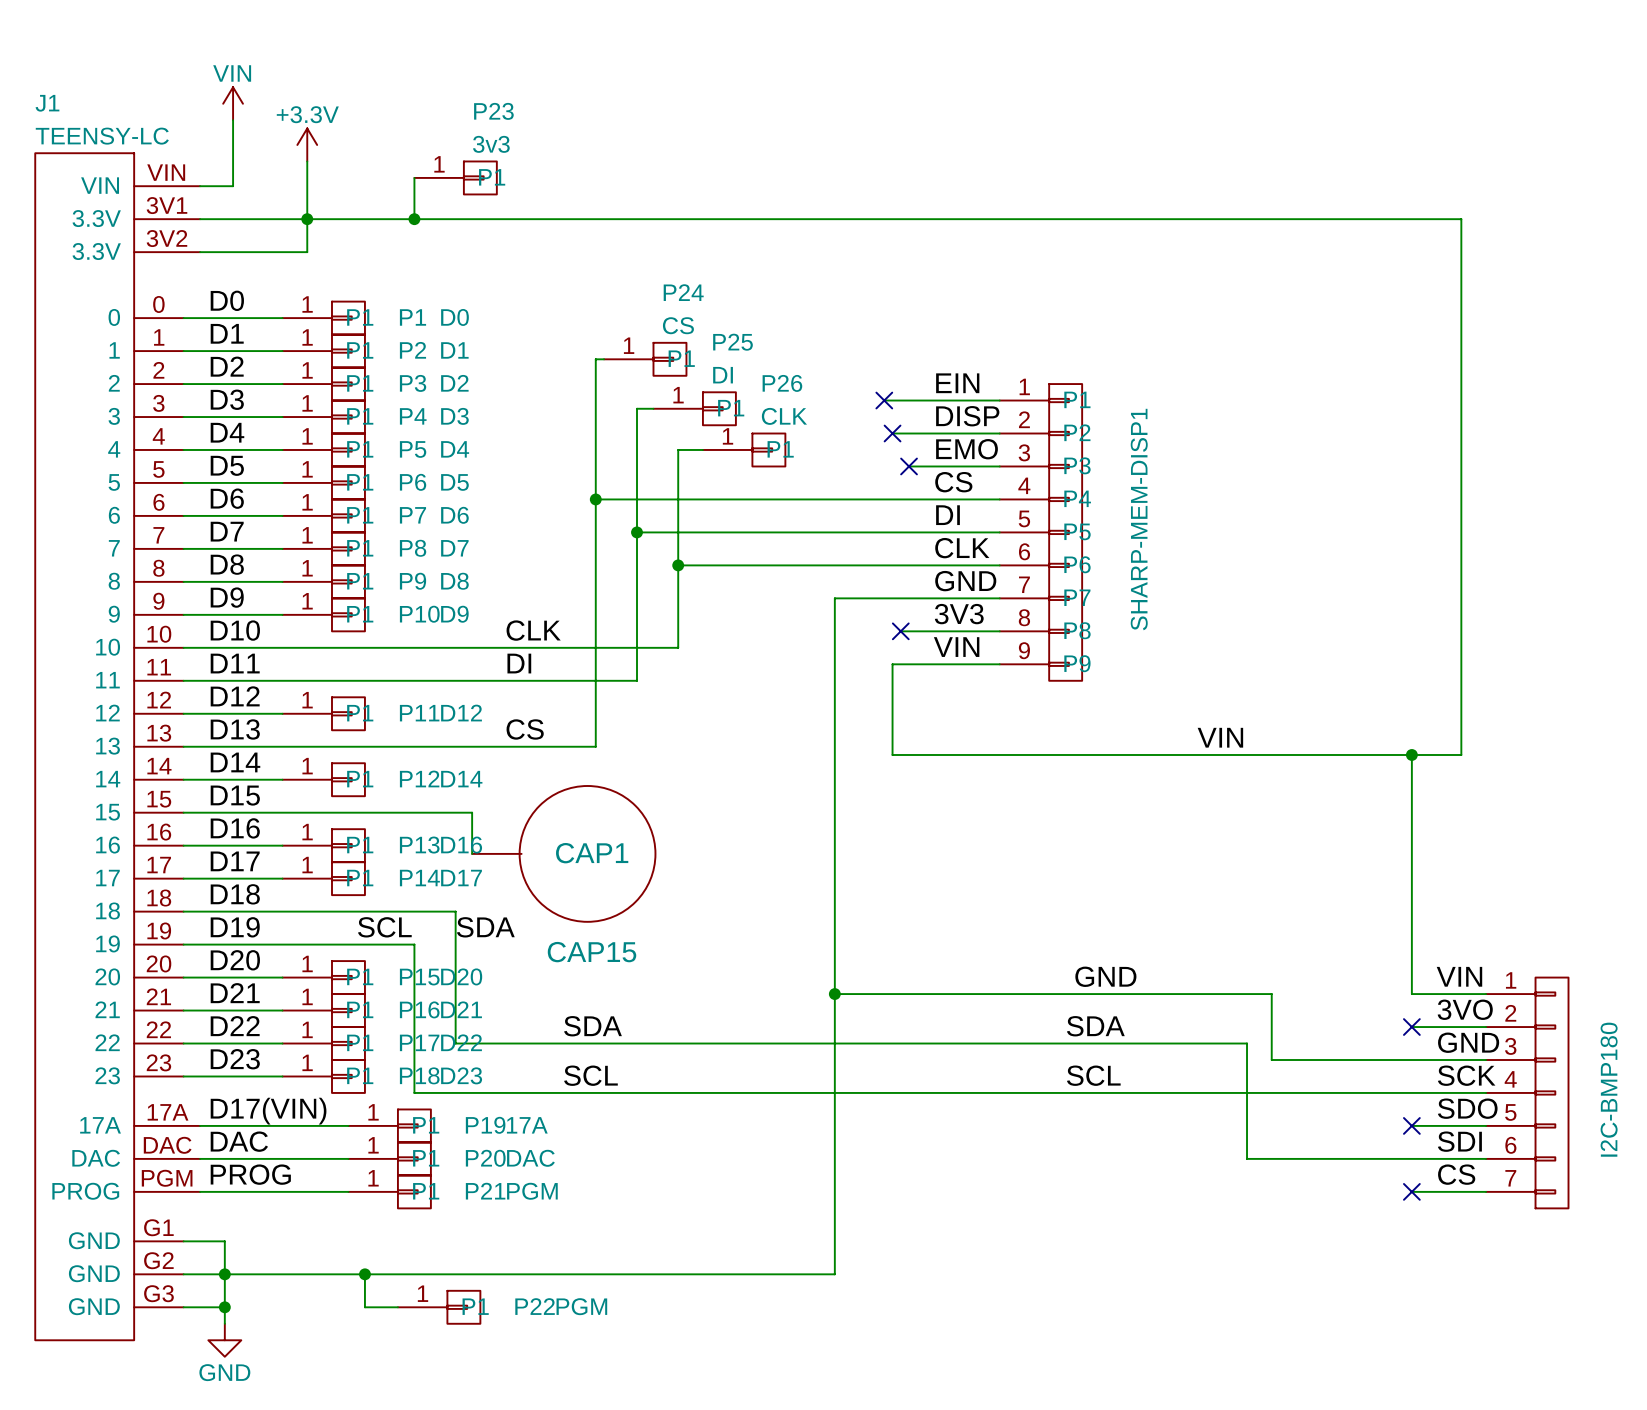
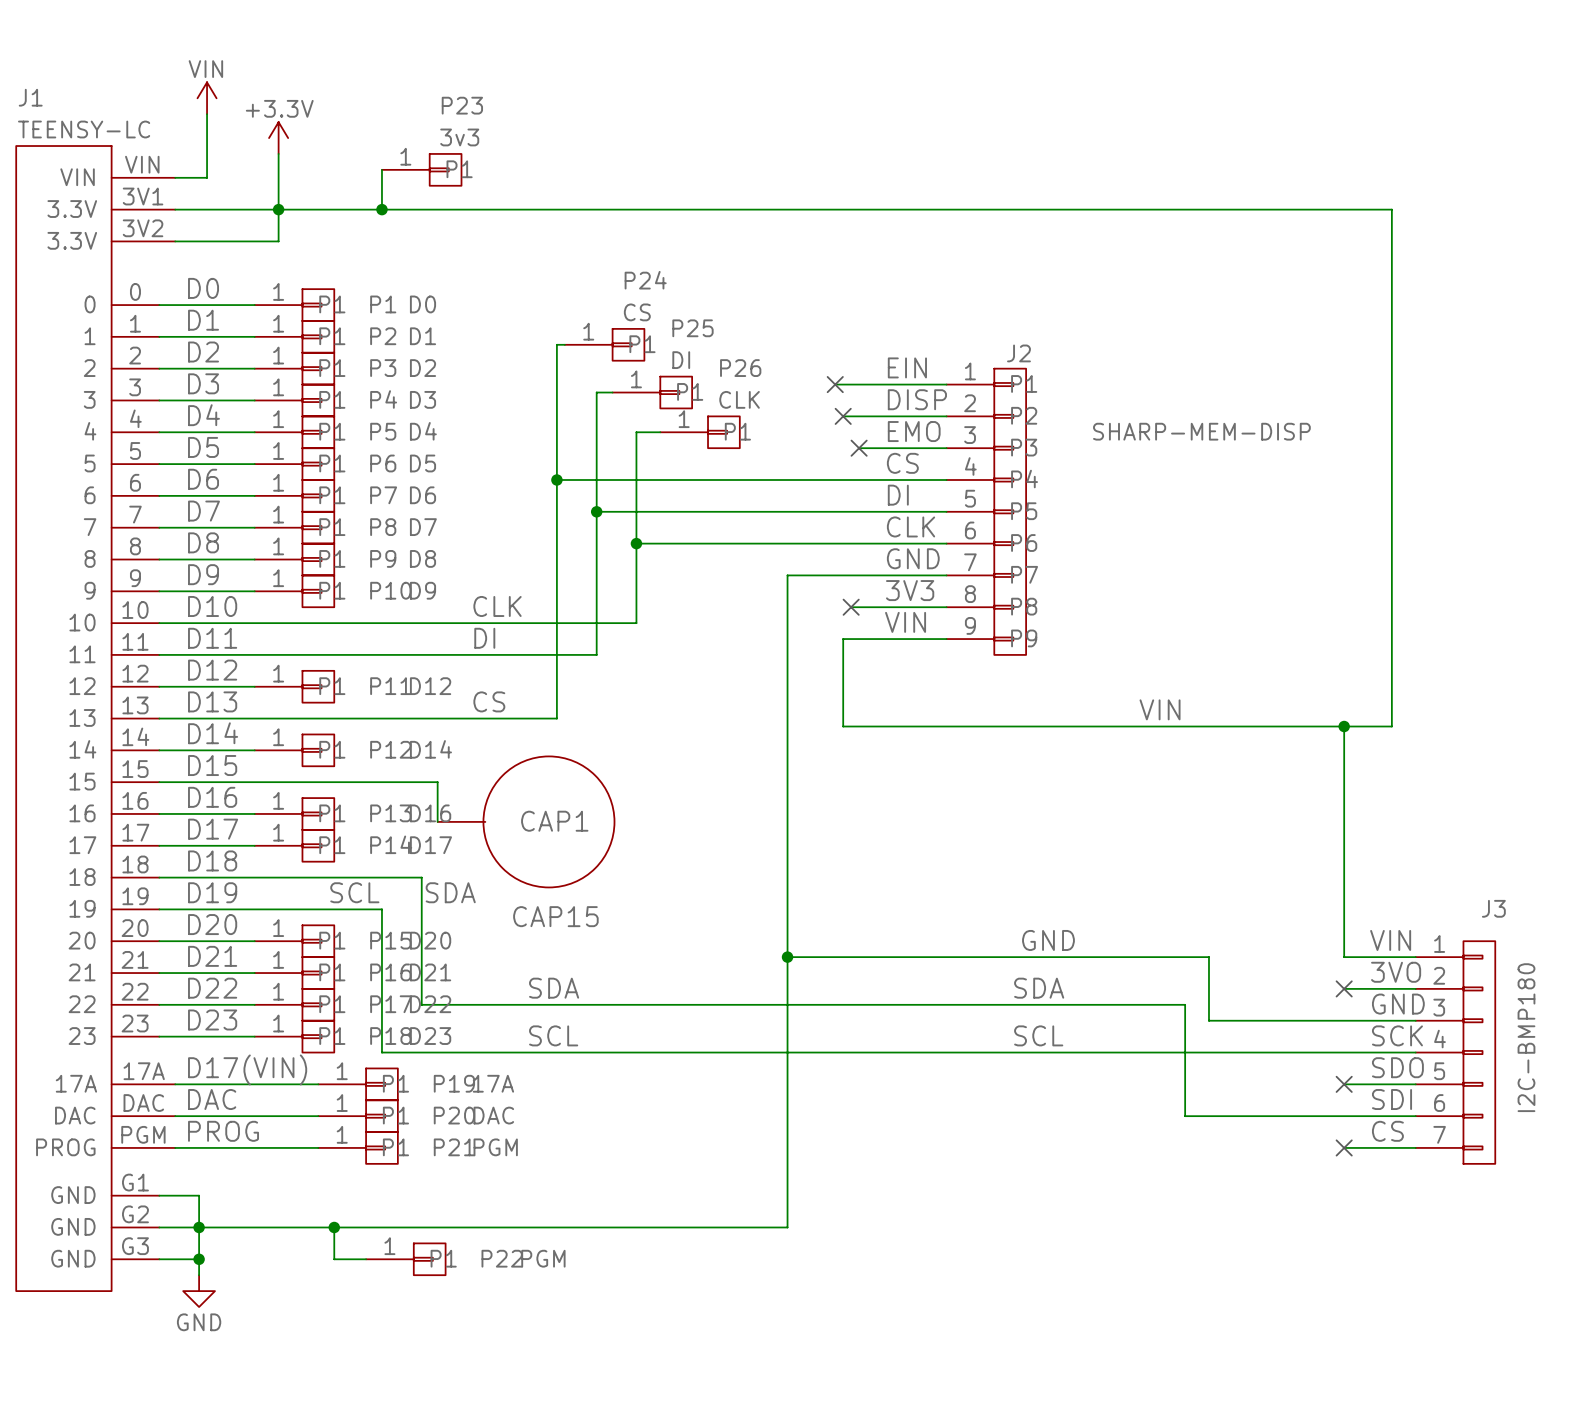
SHARP-MEM-DISP1 value: none -> SHARP-MEM-DISP (1201, 431)
SHARP-MEM-DISP1 name: SHARP-MEM-DISP1 (1139, 519) -> J2 (1018, 353)
I2C-BMP180 value: none -> I2C-BMP180 (1526, 1037)
I2C-BMP180 name: I2C-BMP180 (1609, 1089) -> J3 (1493, 908)

